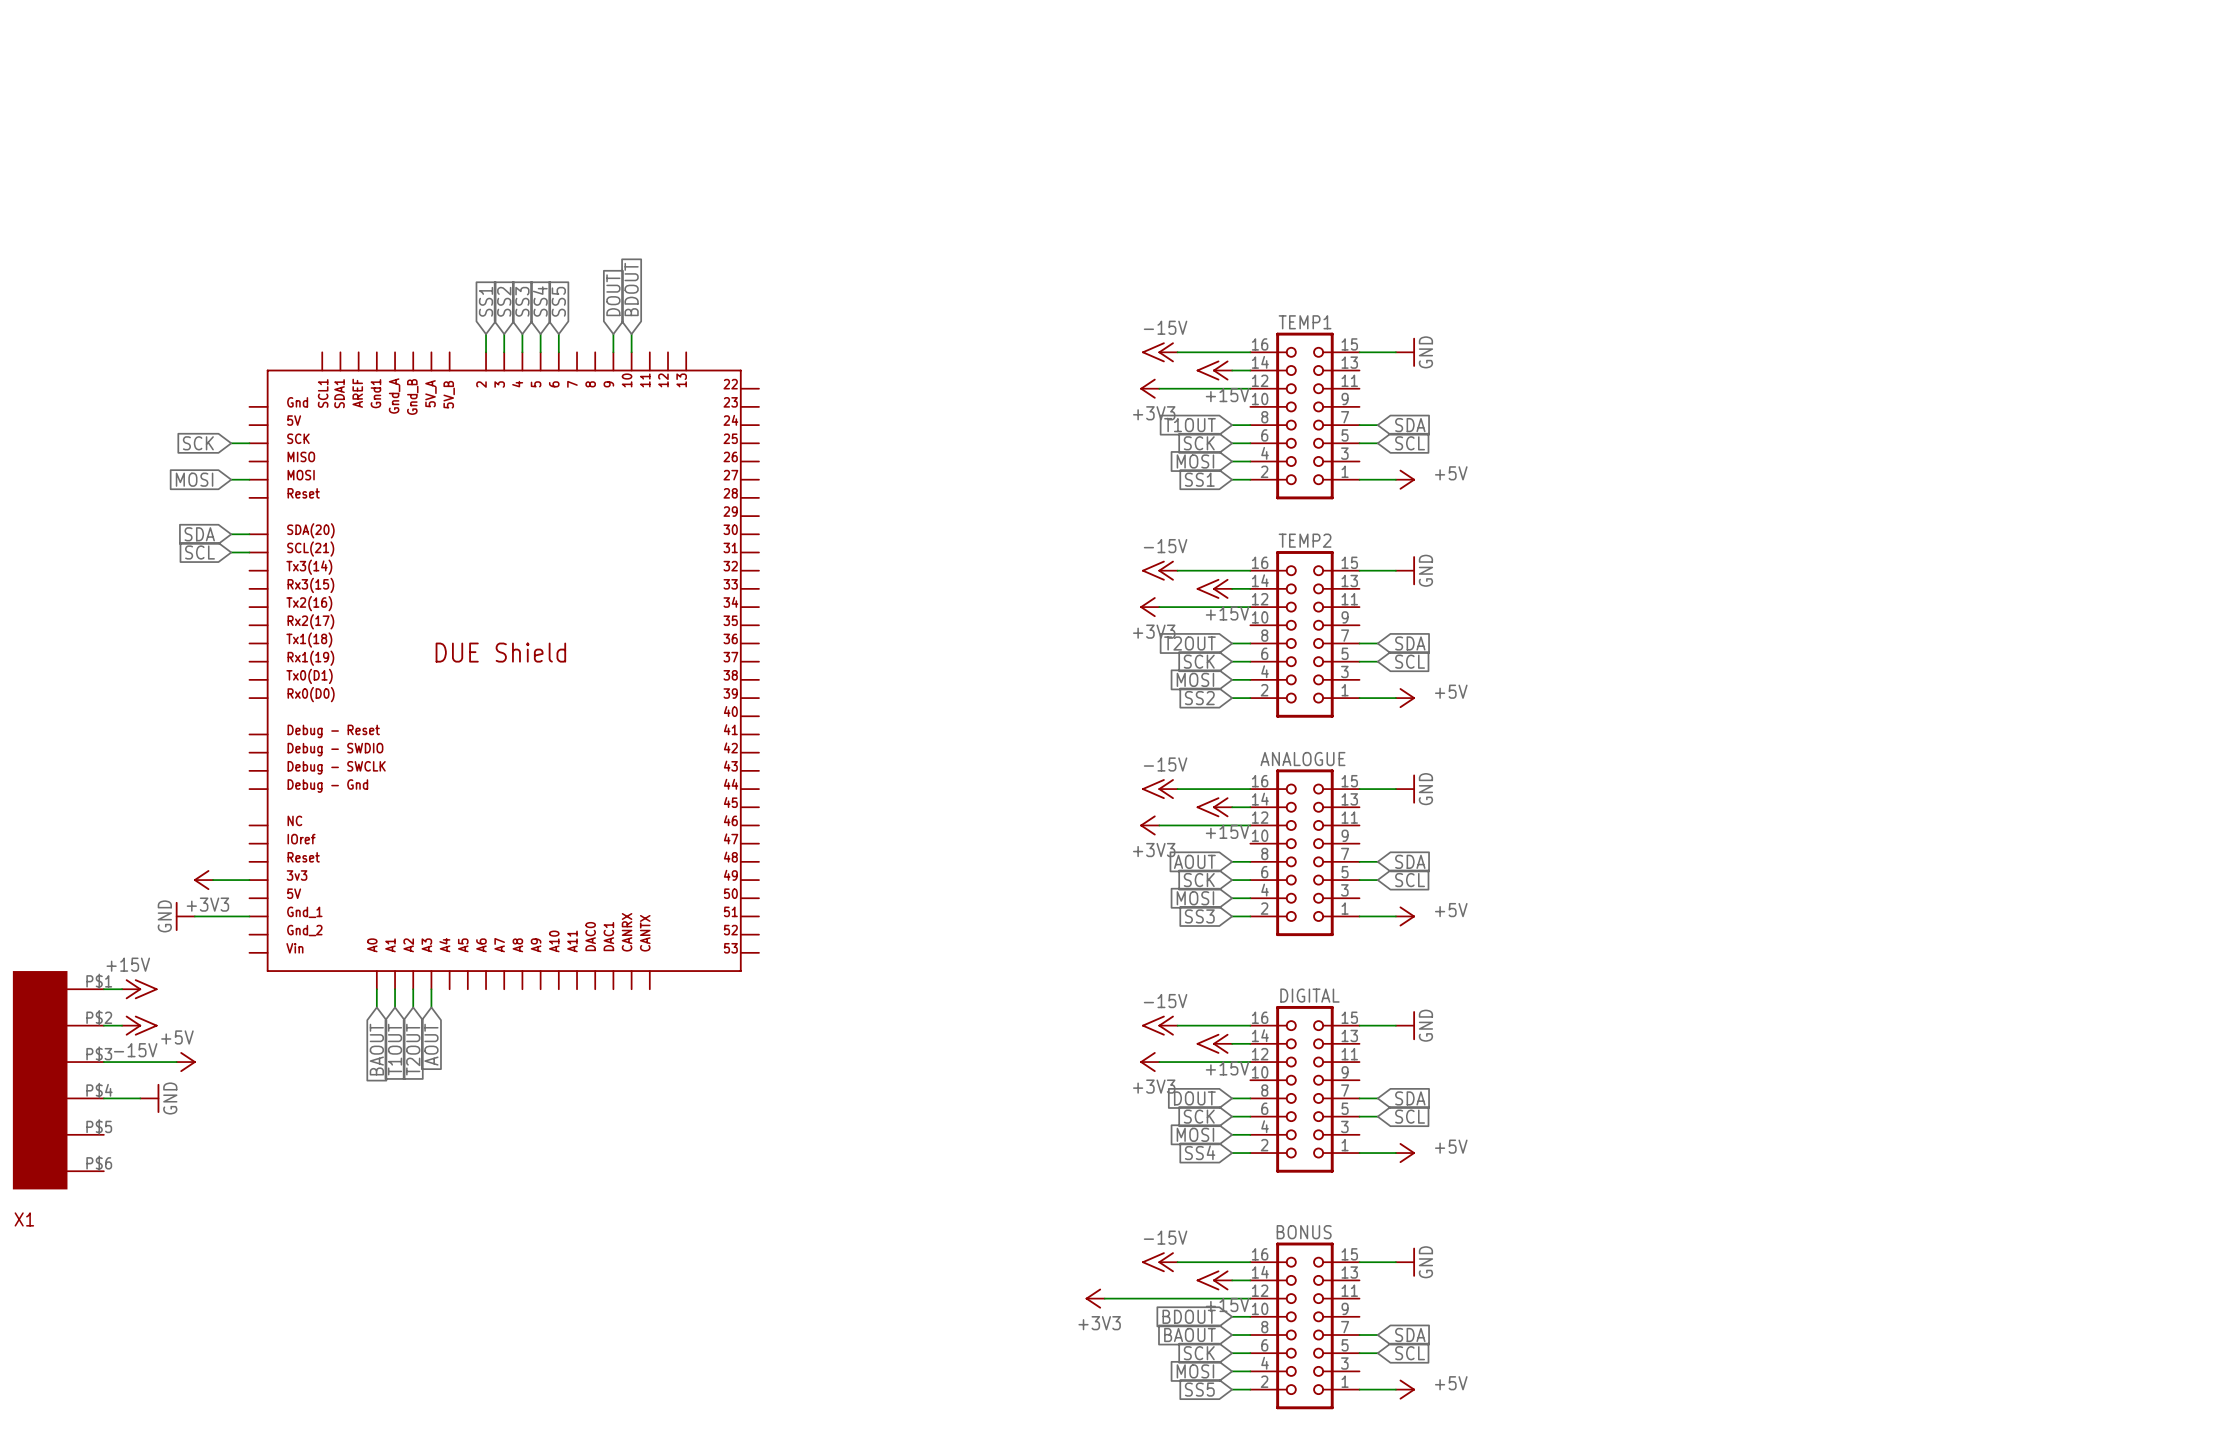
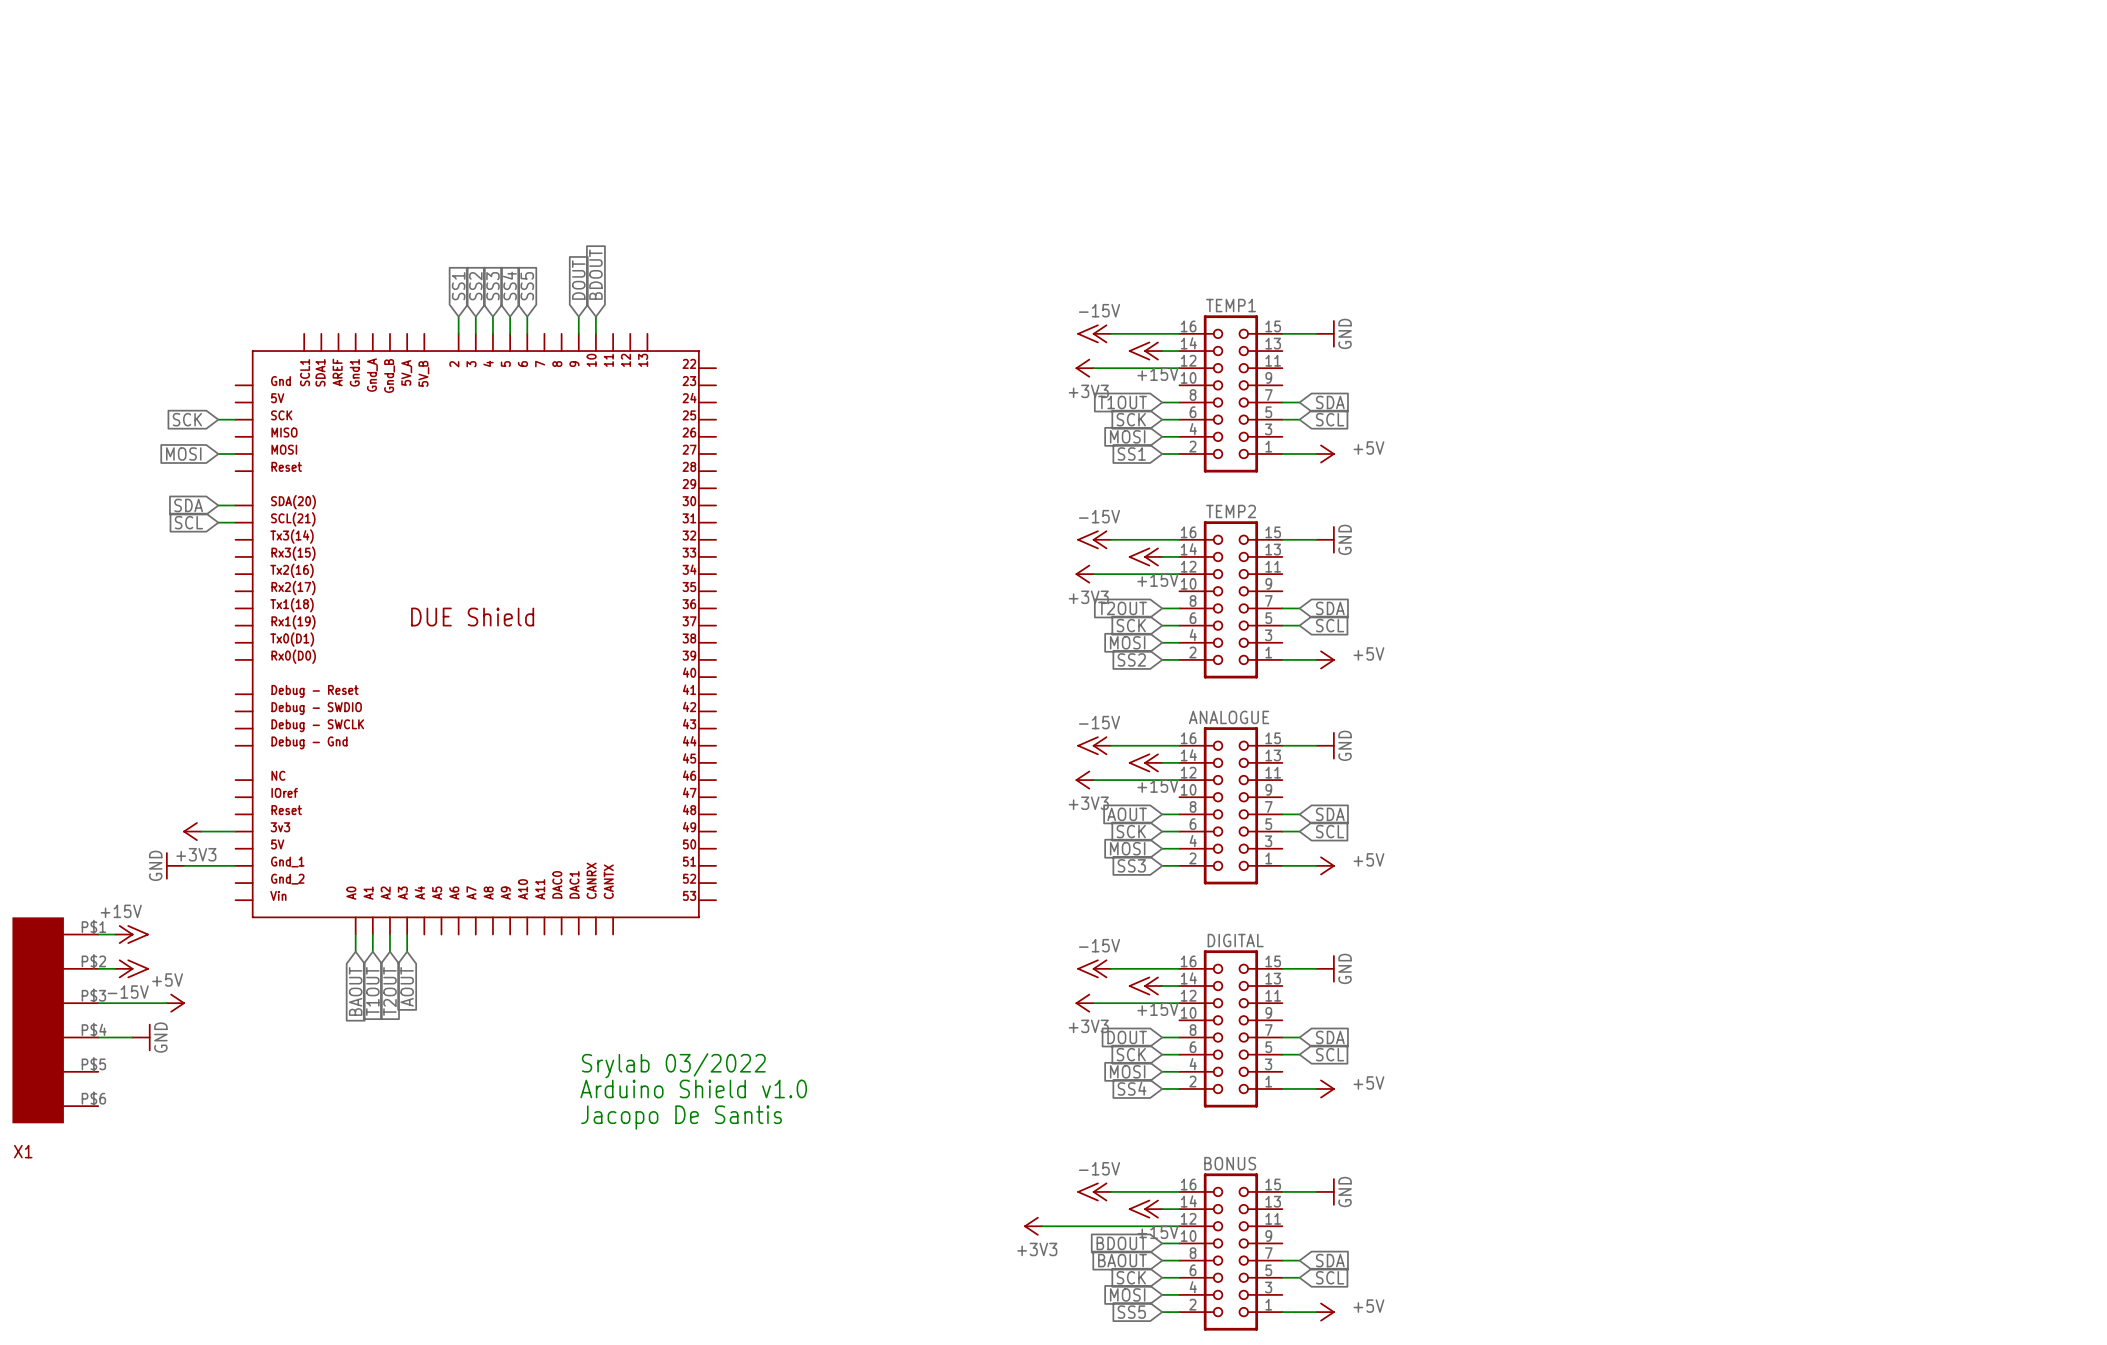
text: none -> Srylab 03/2022 (673, 1065)
text: none -> Arduino Shield v1.0 (693, 1088)
text: none -> Jacopo De Santis (681, 1117)

